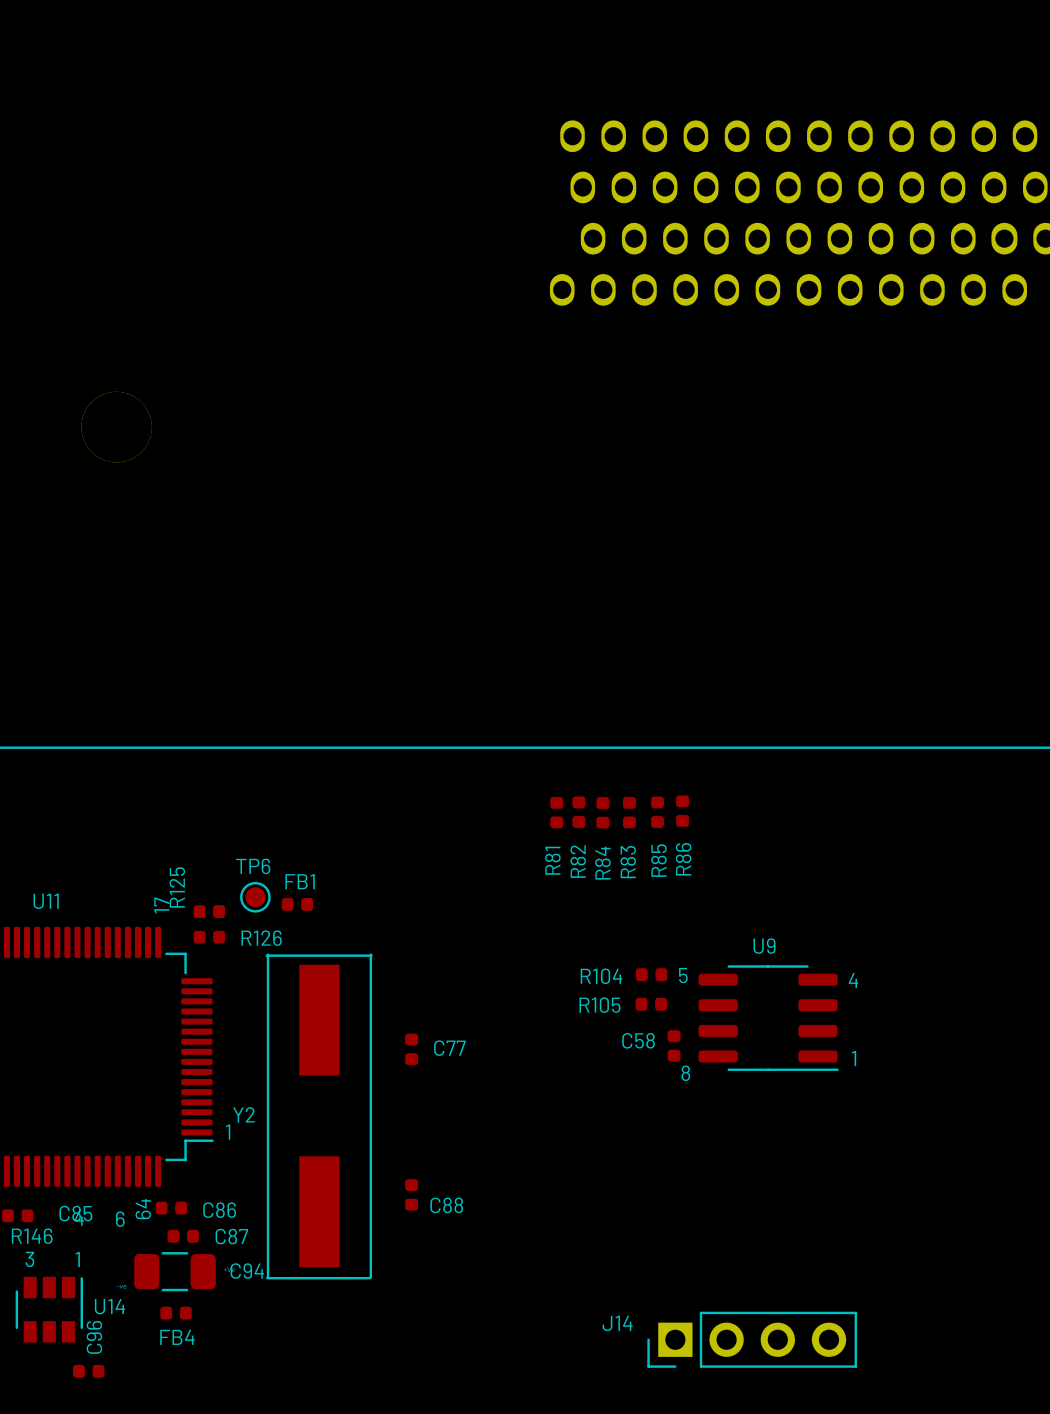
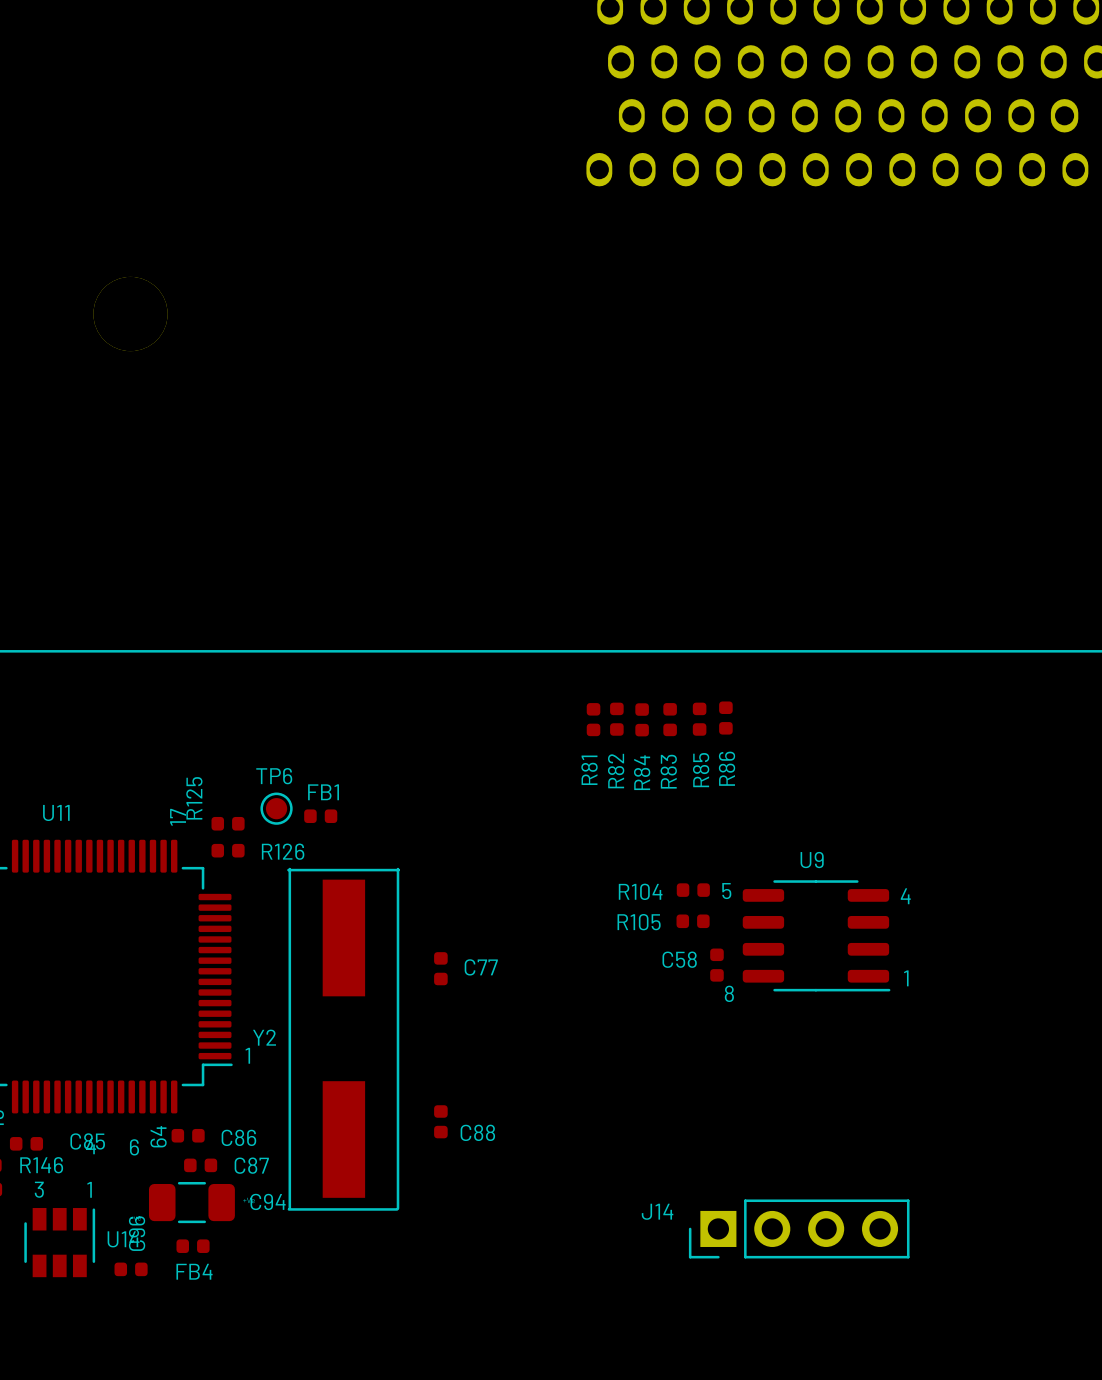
J14 position: (752, 1339) -> (799, 1228)
C96 position: (88, 1371) -> (131, 1269)

